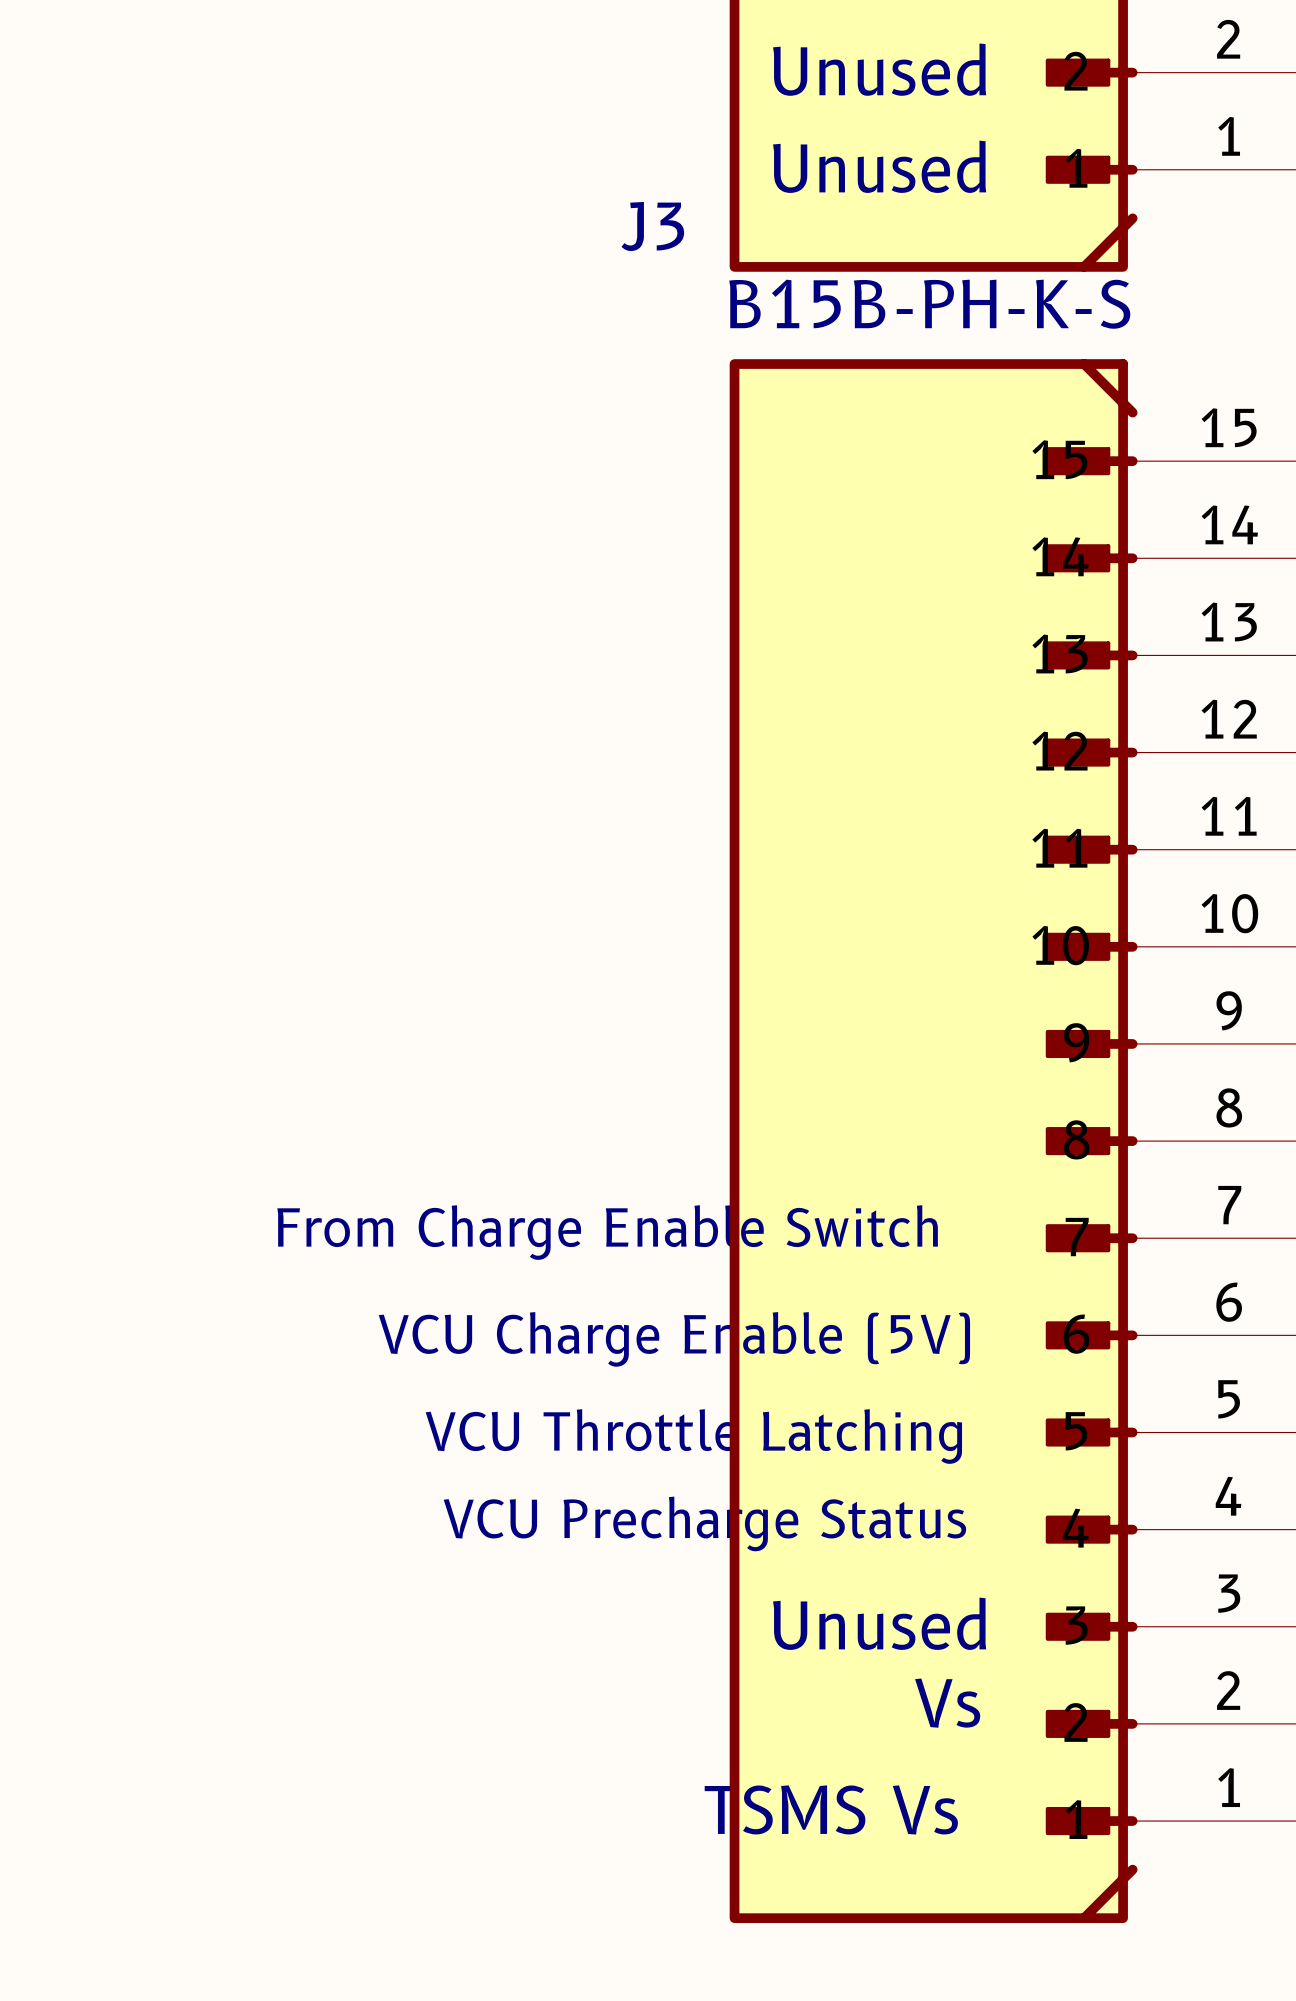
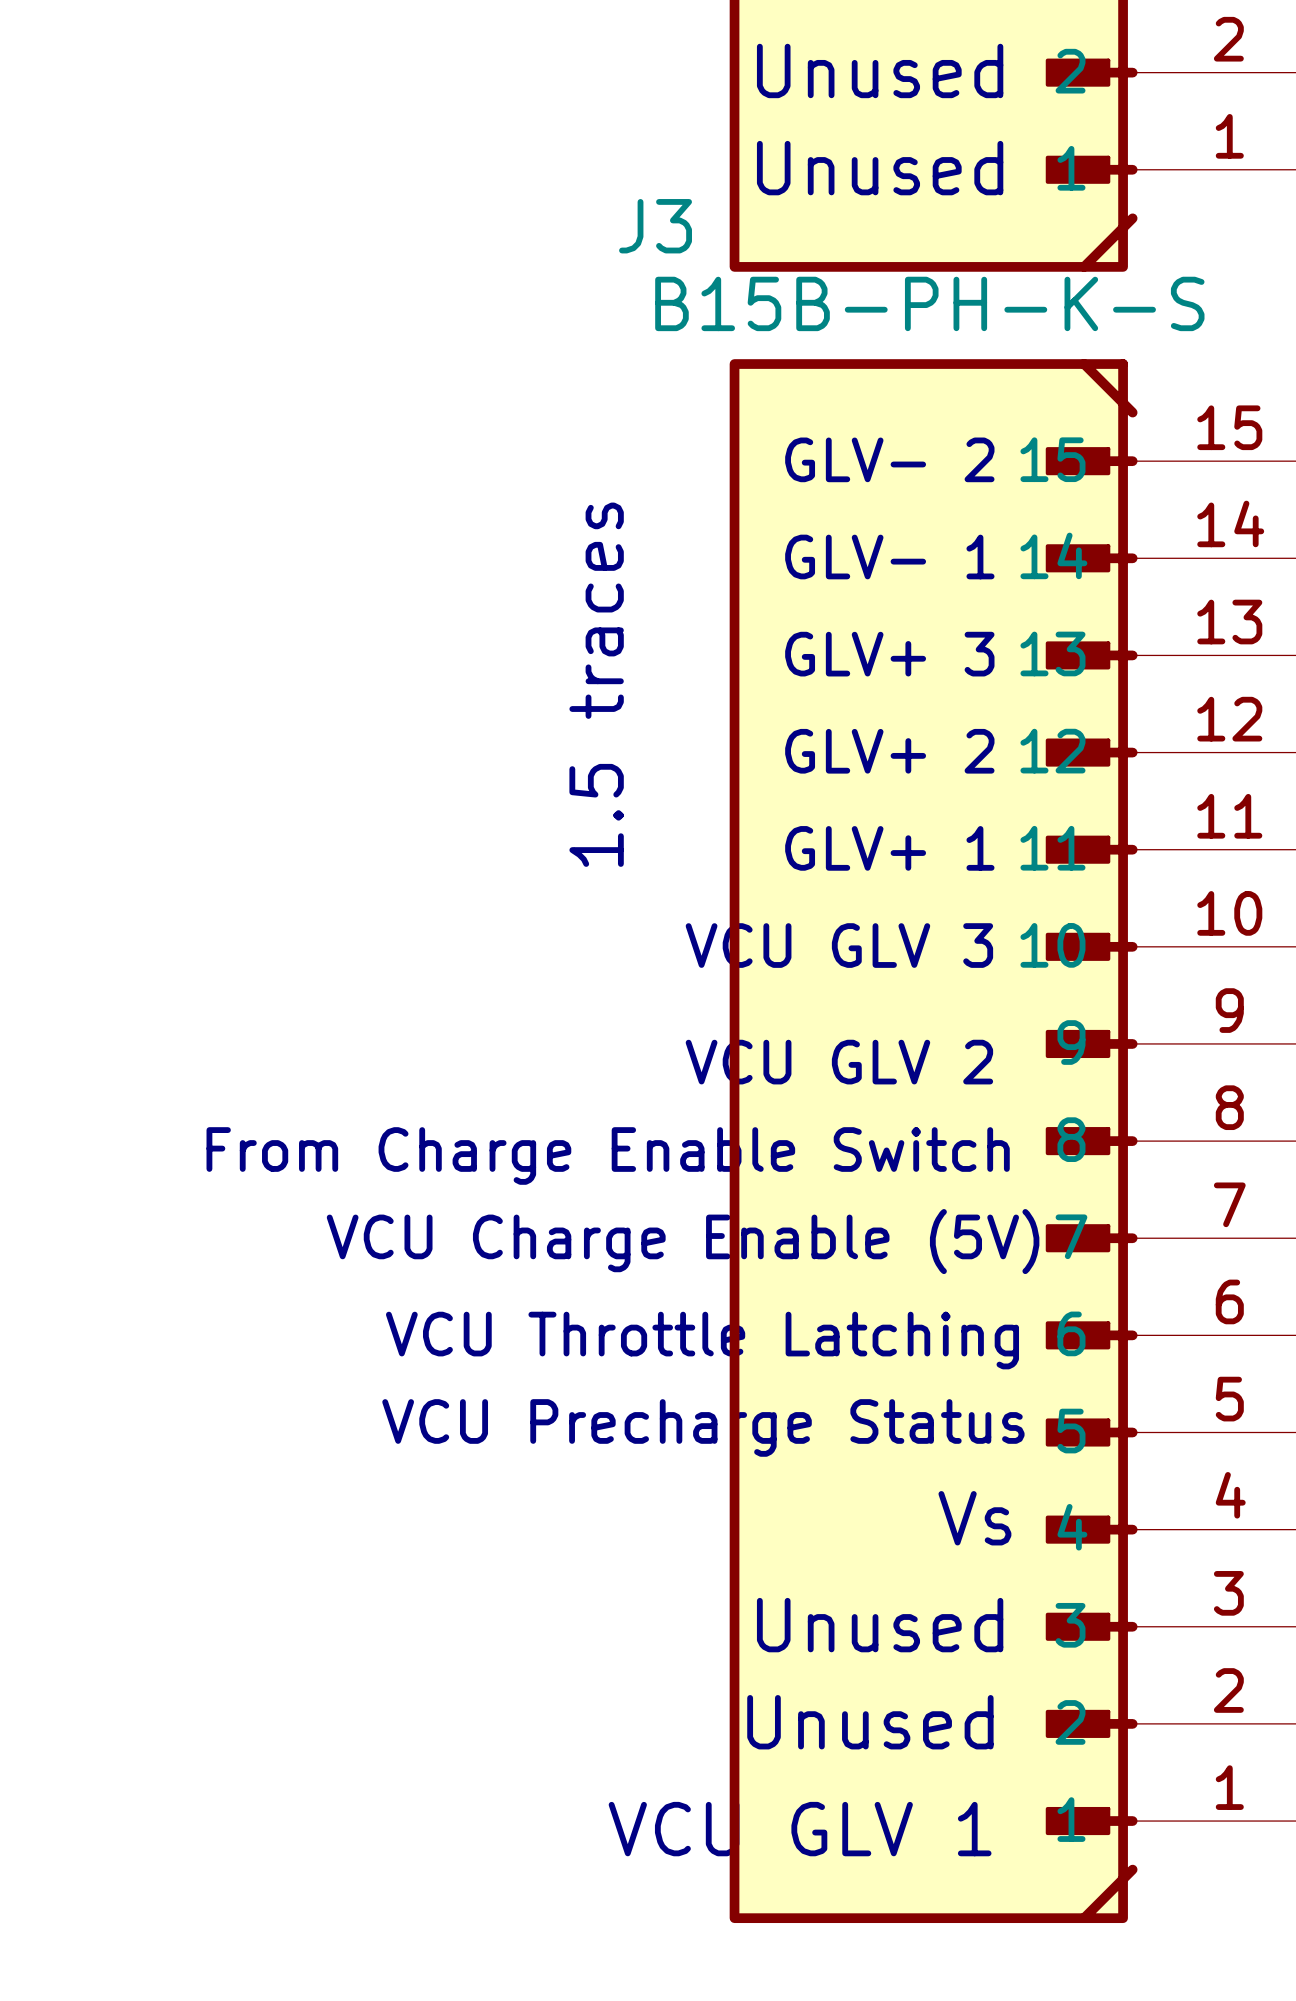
text: none -> GLV- 2 (889, 459)
text: none -> GLV- 1 (889, 556)
text: none -> GLV+ 3 (889, 654)
text: none -> 1.5 traces (596, 684)
text: none -> GLV+ 2 (889, 751)
text: none -> GLV+ 1 (889, 848)
text: none -> VCU GLV 3 (839, 945)
text: none -> VCU GLV 2 (839, 1062)
text position: From Charge Enable Switch (607, 1232) -> From Charge Enable Switch (608, 1155)
text position: VCU Charge Enable (5V) (674, 1339) -> VCU Charge Enable (5V) (683, 1241)
text position: VCU Throttle Latching (693, 1436) -> VCU Throttle Latching (702, 1340)
text position: VCU Precharge Status (704, 1523) -> VCU Precharge Status (703, 1427)
text position: Vs (947, 1703) -> Vs (974, 1518)
text: none -> Unused (870, 1722)
text: TSMS Vs (831, 1809) -> VCU GLV 1 (800, 1829)

